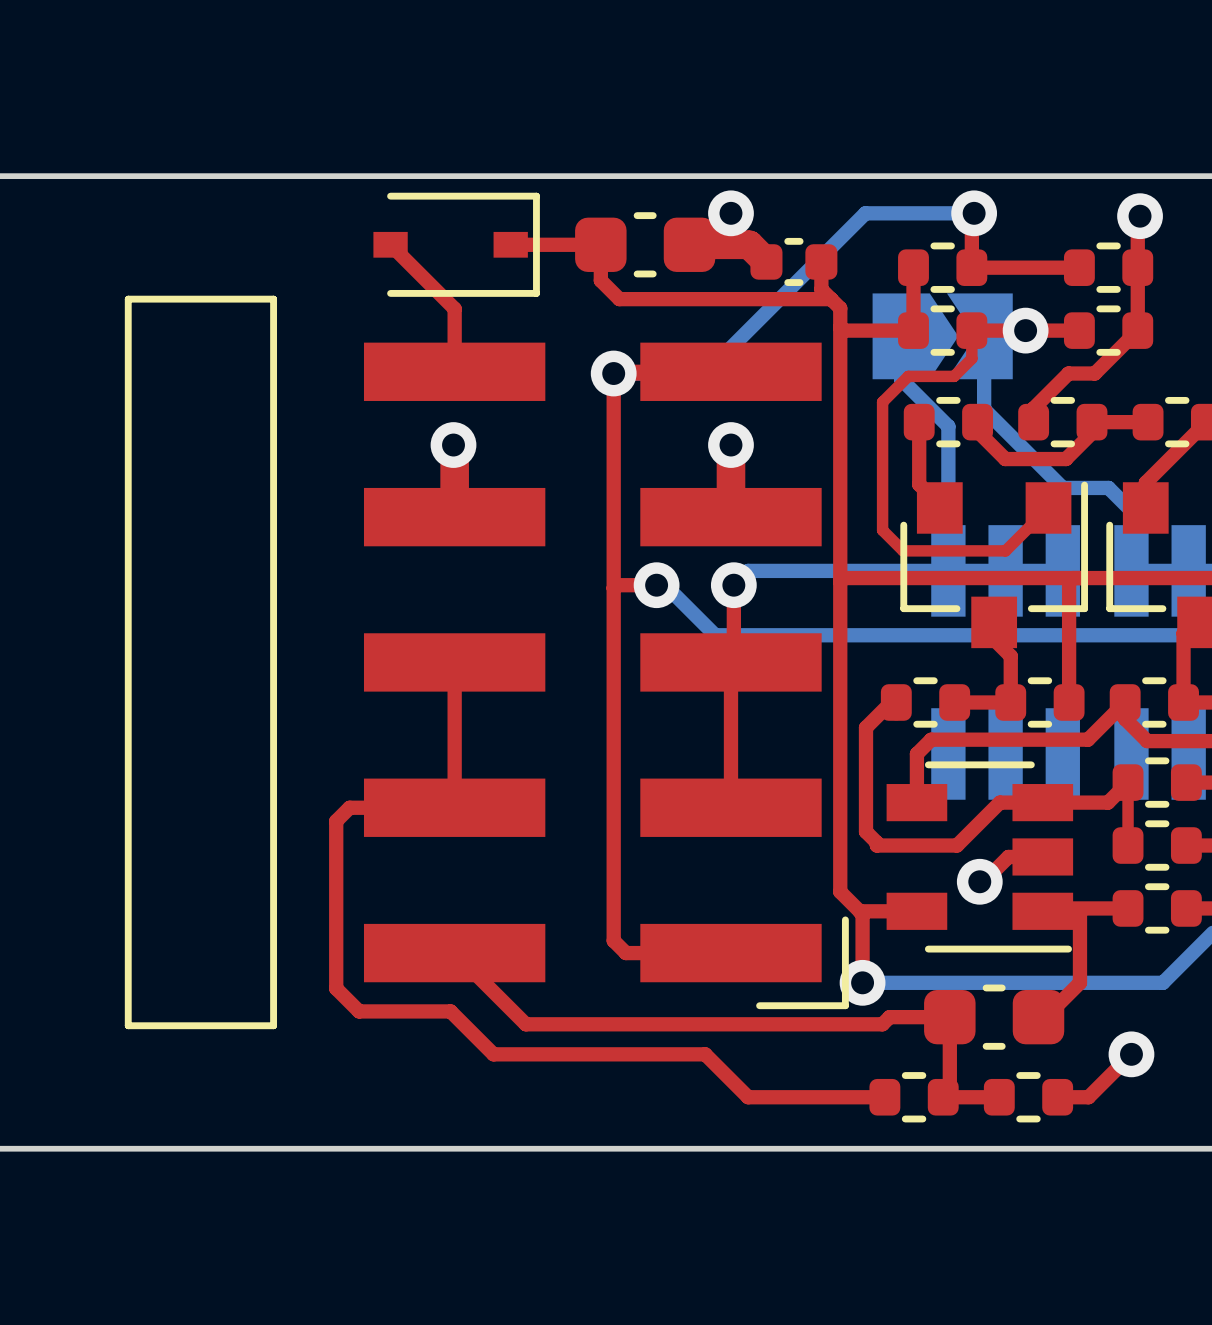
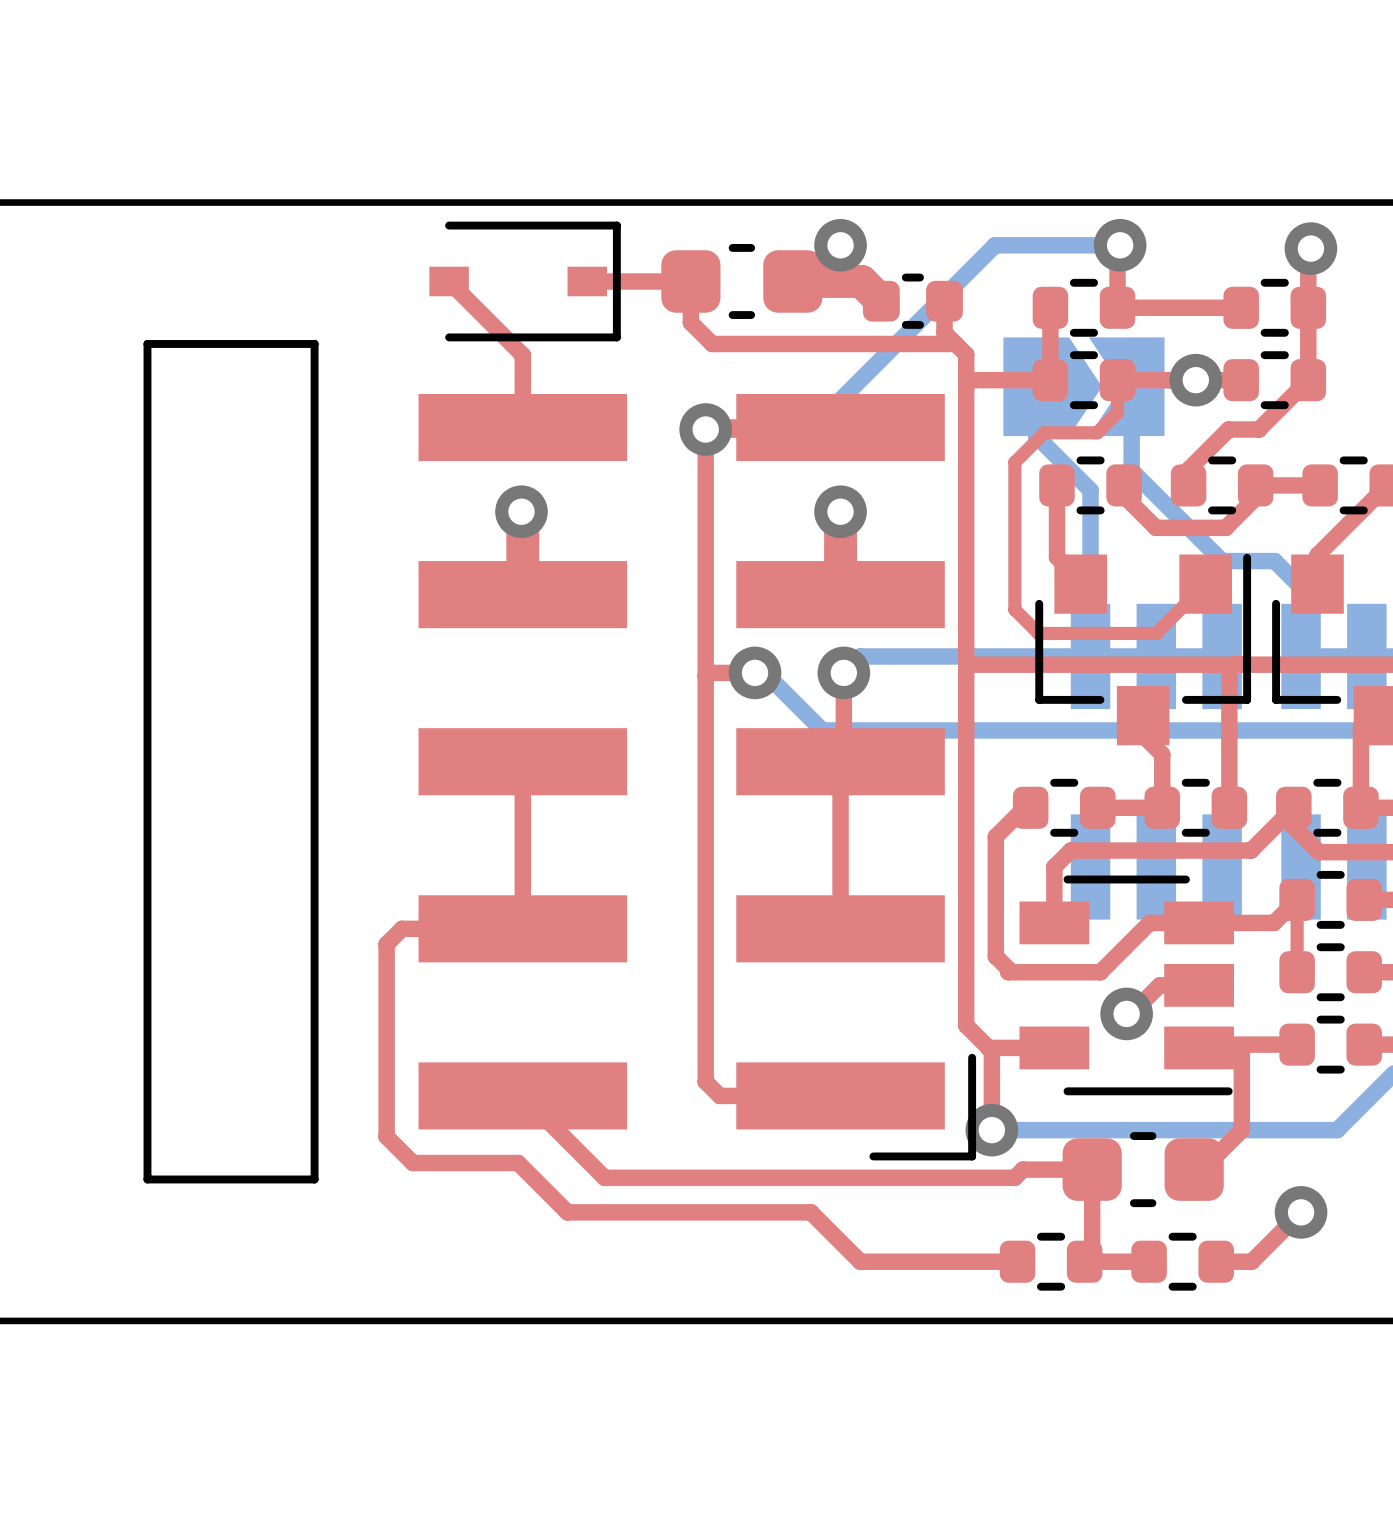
via position: (1025, 330) -> (1195, 380)

